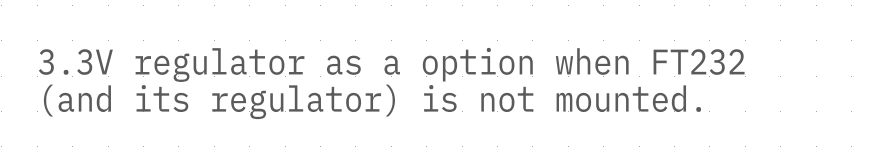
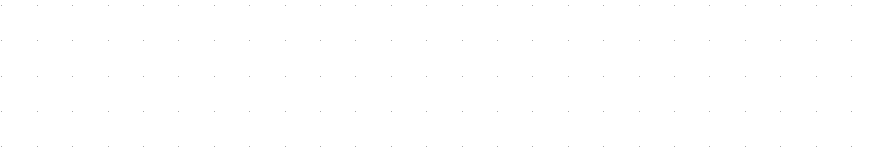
text: 3.3V regulator as a option when FT232 (391, 64) -> none
text: (and its regulator) is not mounted. (372, 101) -> none

